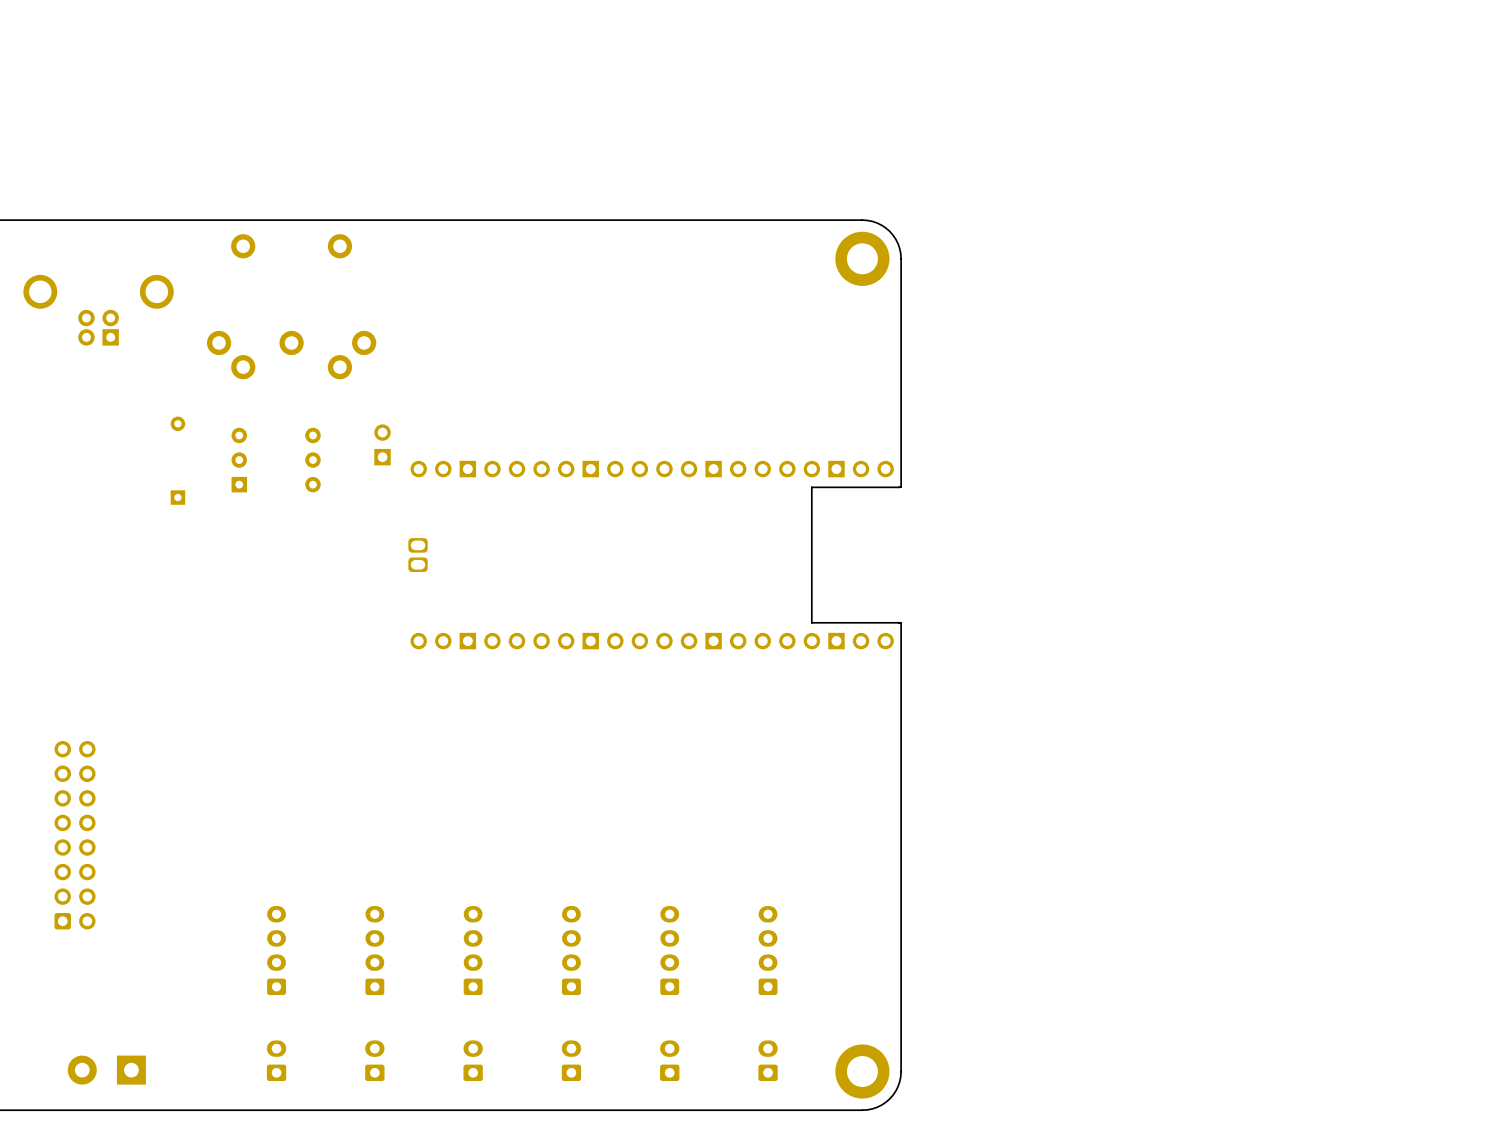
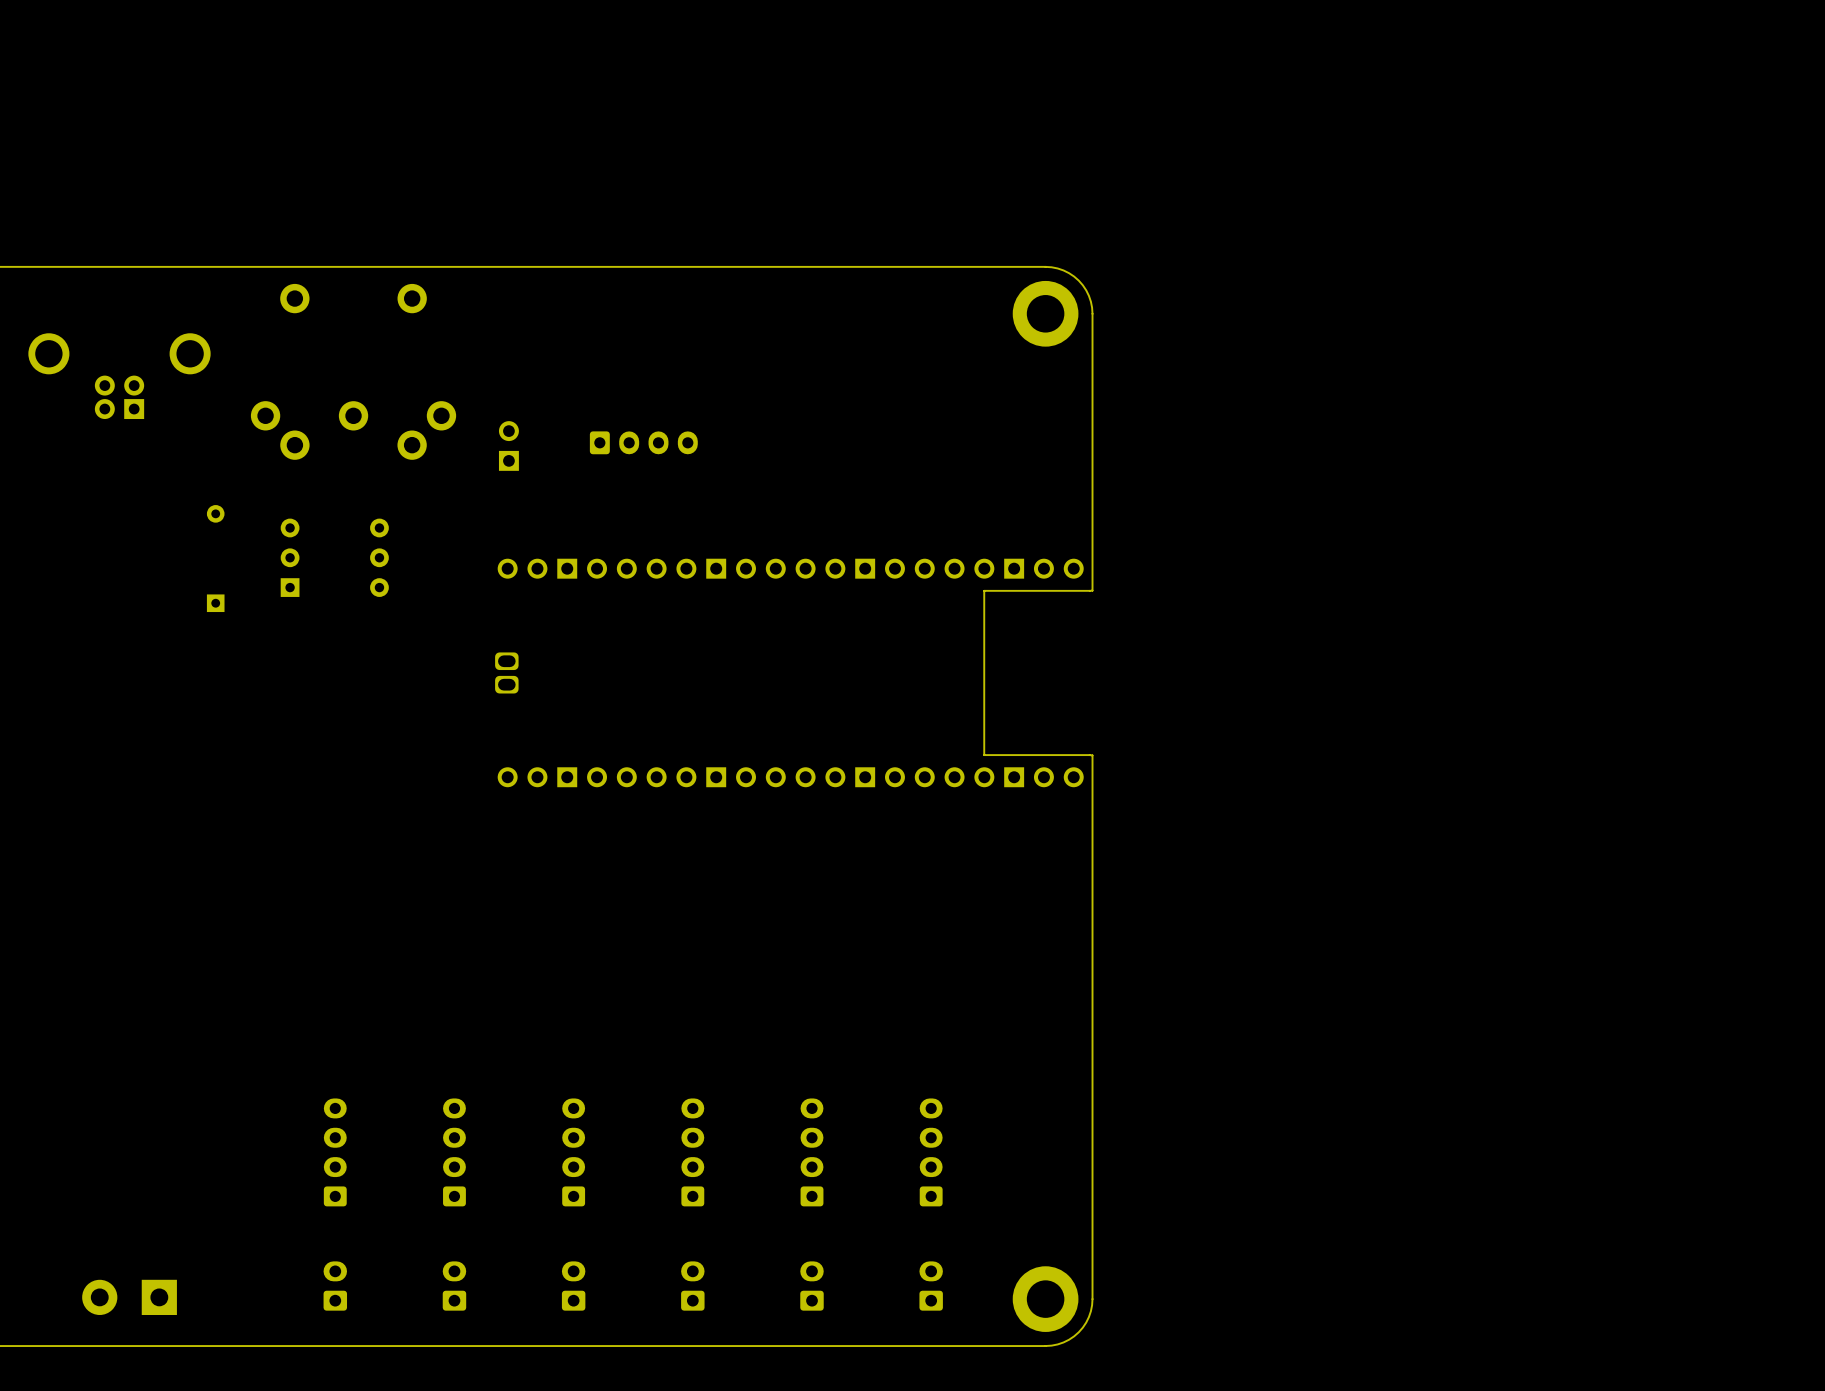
part: none -> (643, 442)
part position: (382, 444) -> (508, 445)
part: (75, 835) -> none

